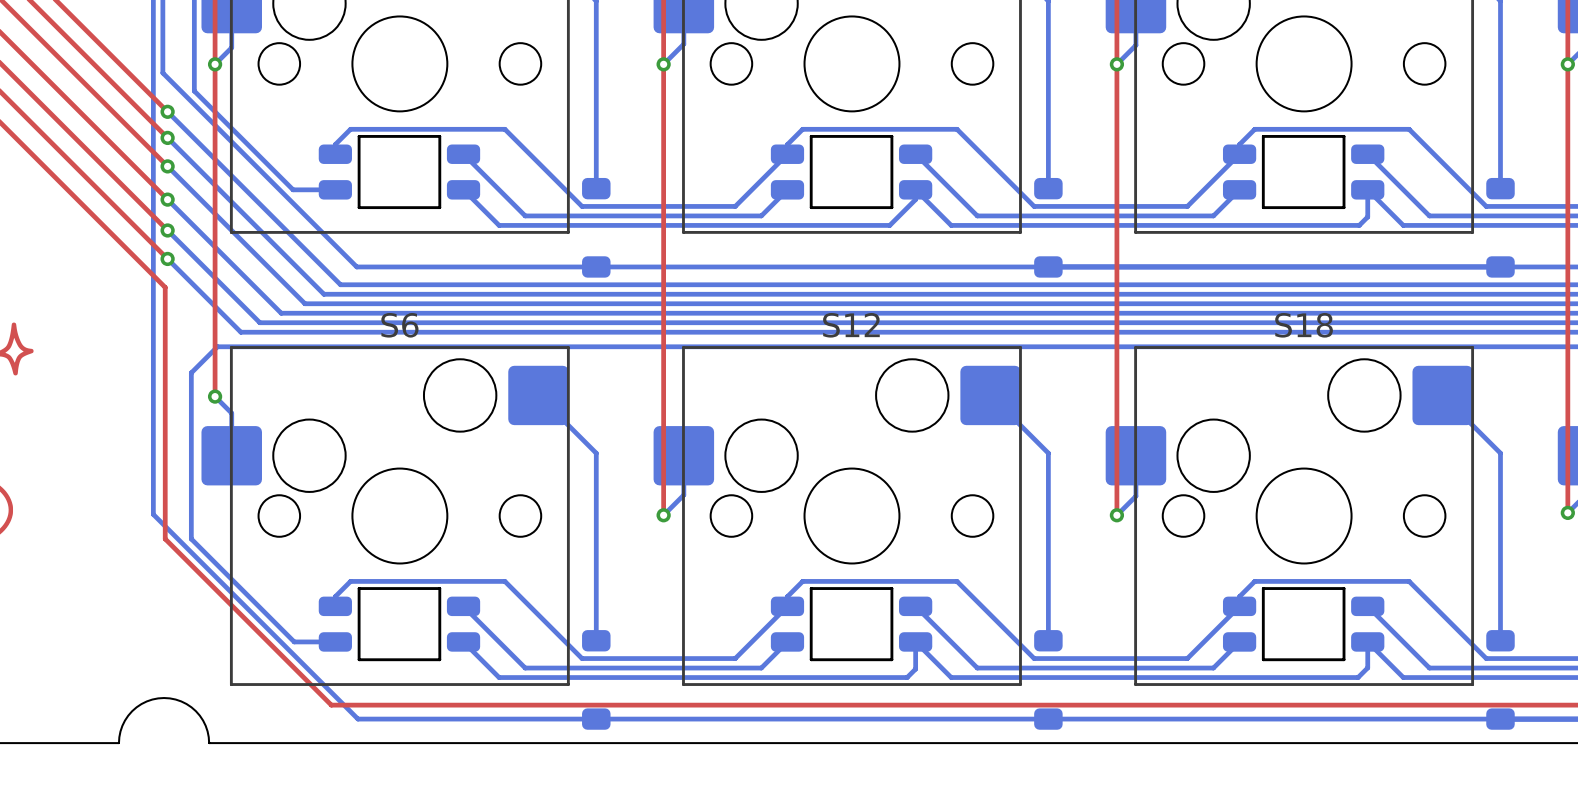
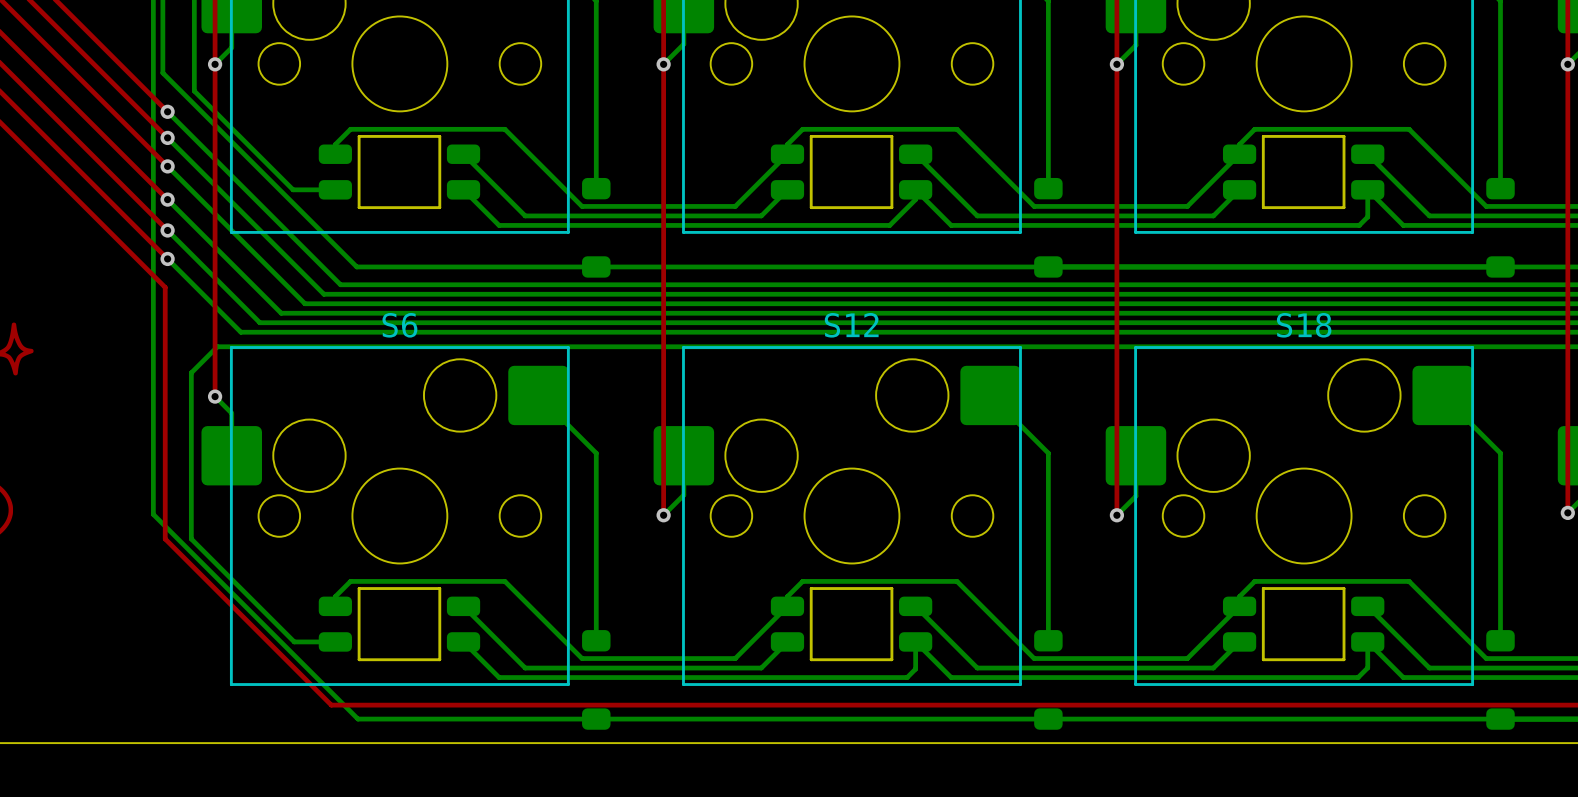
board edge: (118, 743) (122, 725) (132, 711) (146, 701) (164, 698) (181, 701) (195, 711) (205, 725) (209, 743) -> (118, 743) (209, 743)

